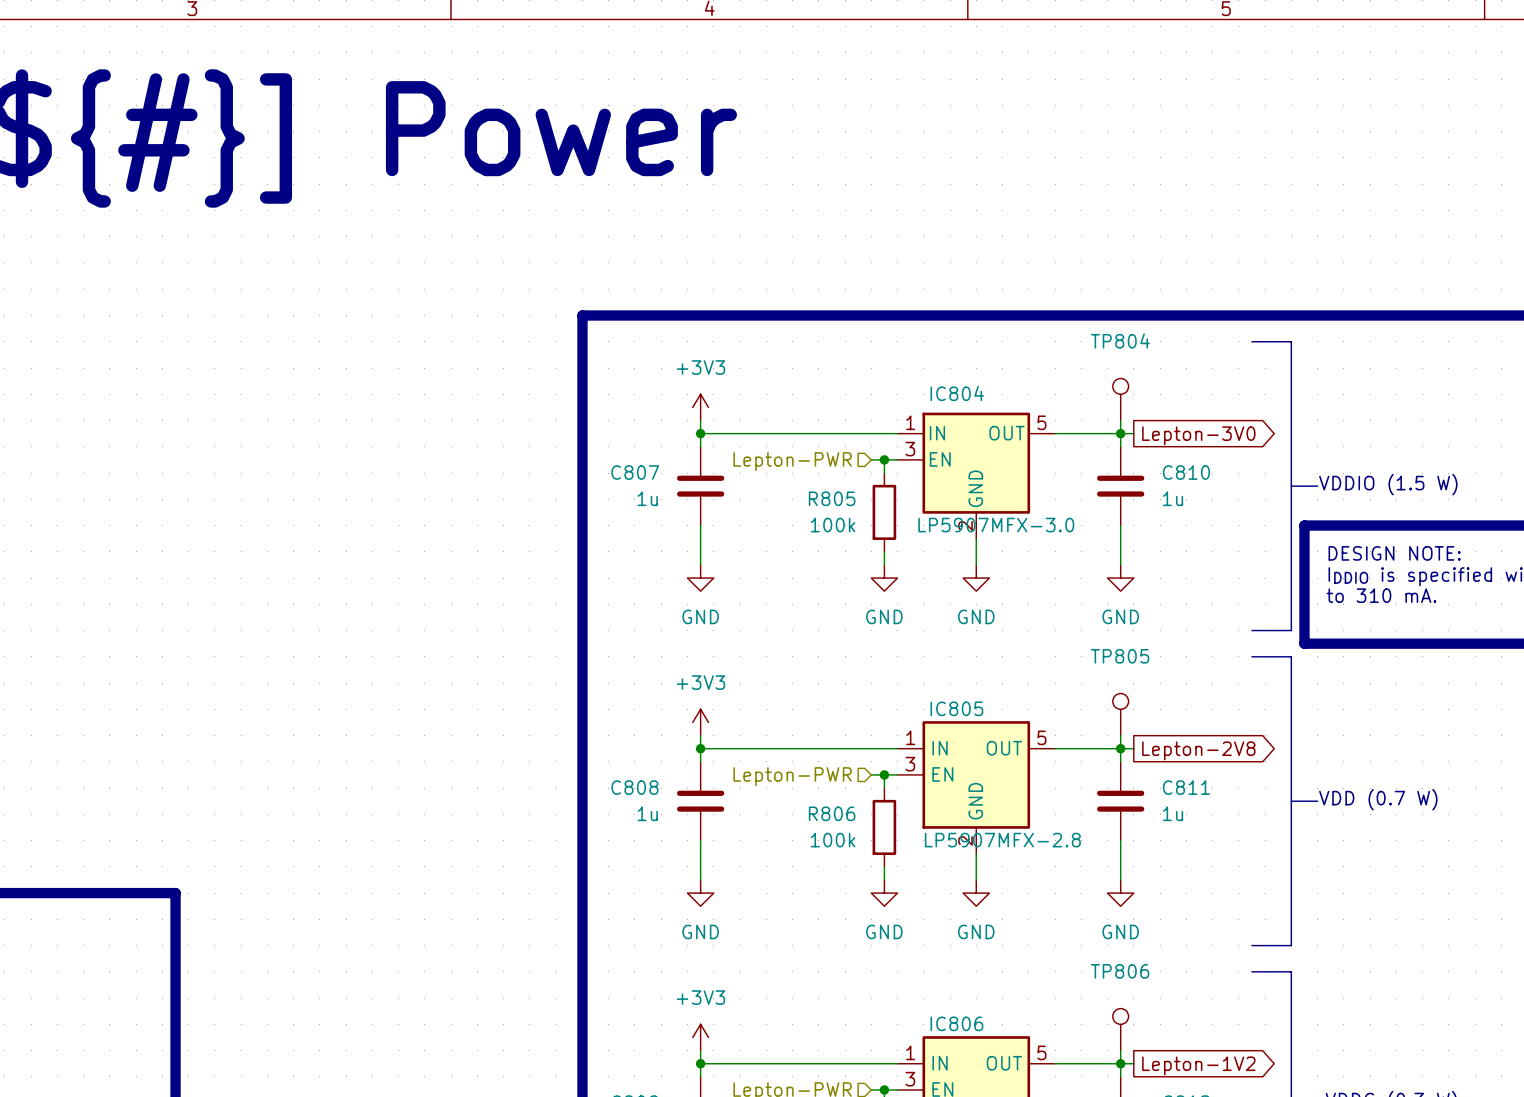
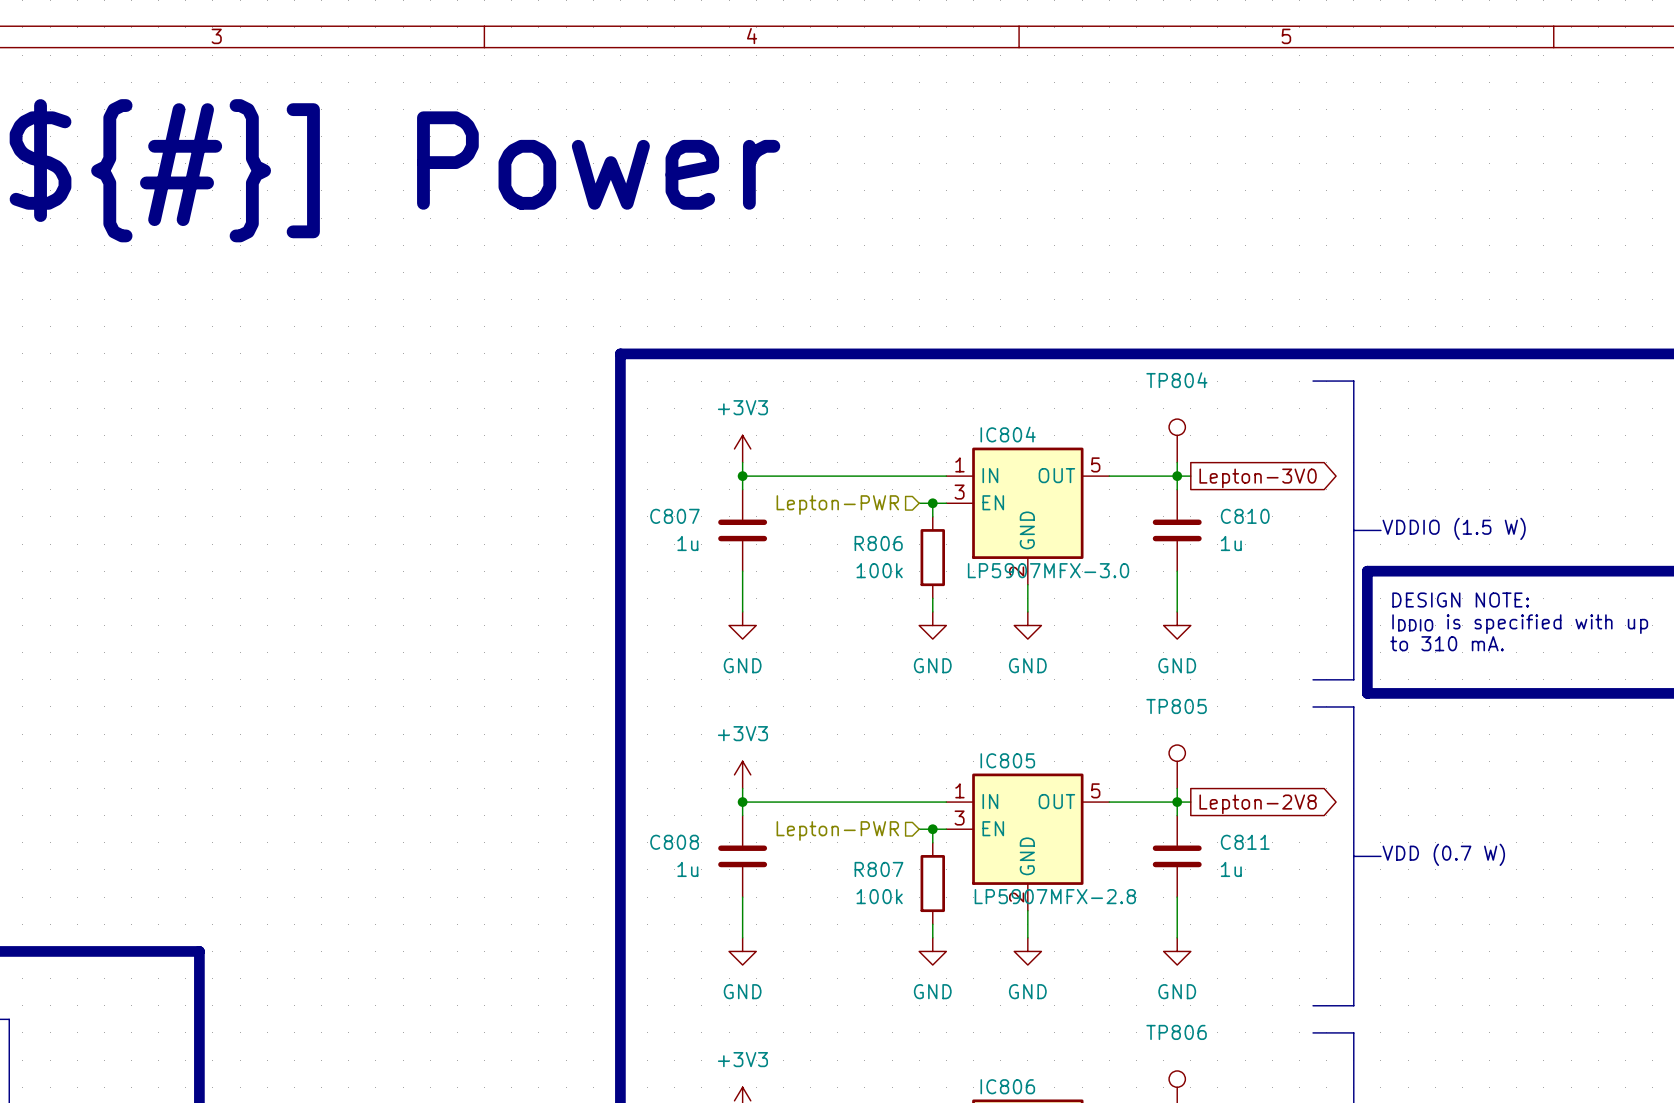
IC804 symbol: [897, 412, 1056, 539] -> [946, 447, 1110, 585]
R805 name: R805 (832, 498) -> R806 (878, 543)
R806 name: R806 (832, 813) -> R807 (878, 869)

